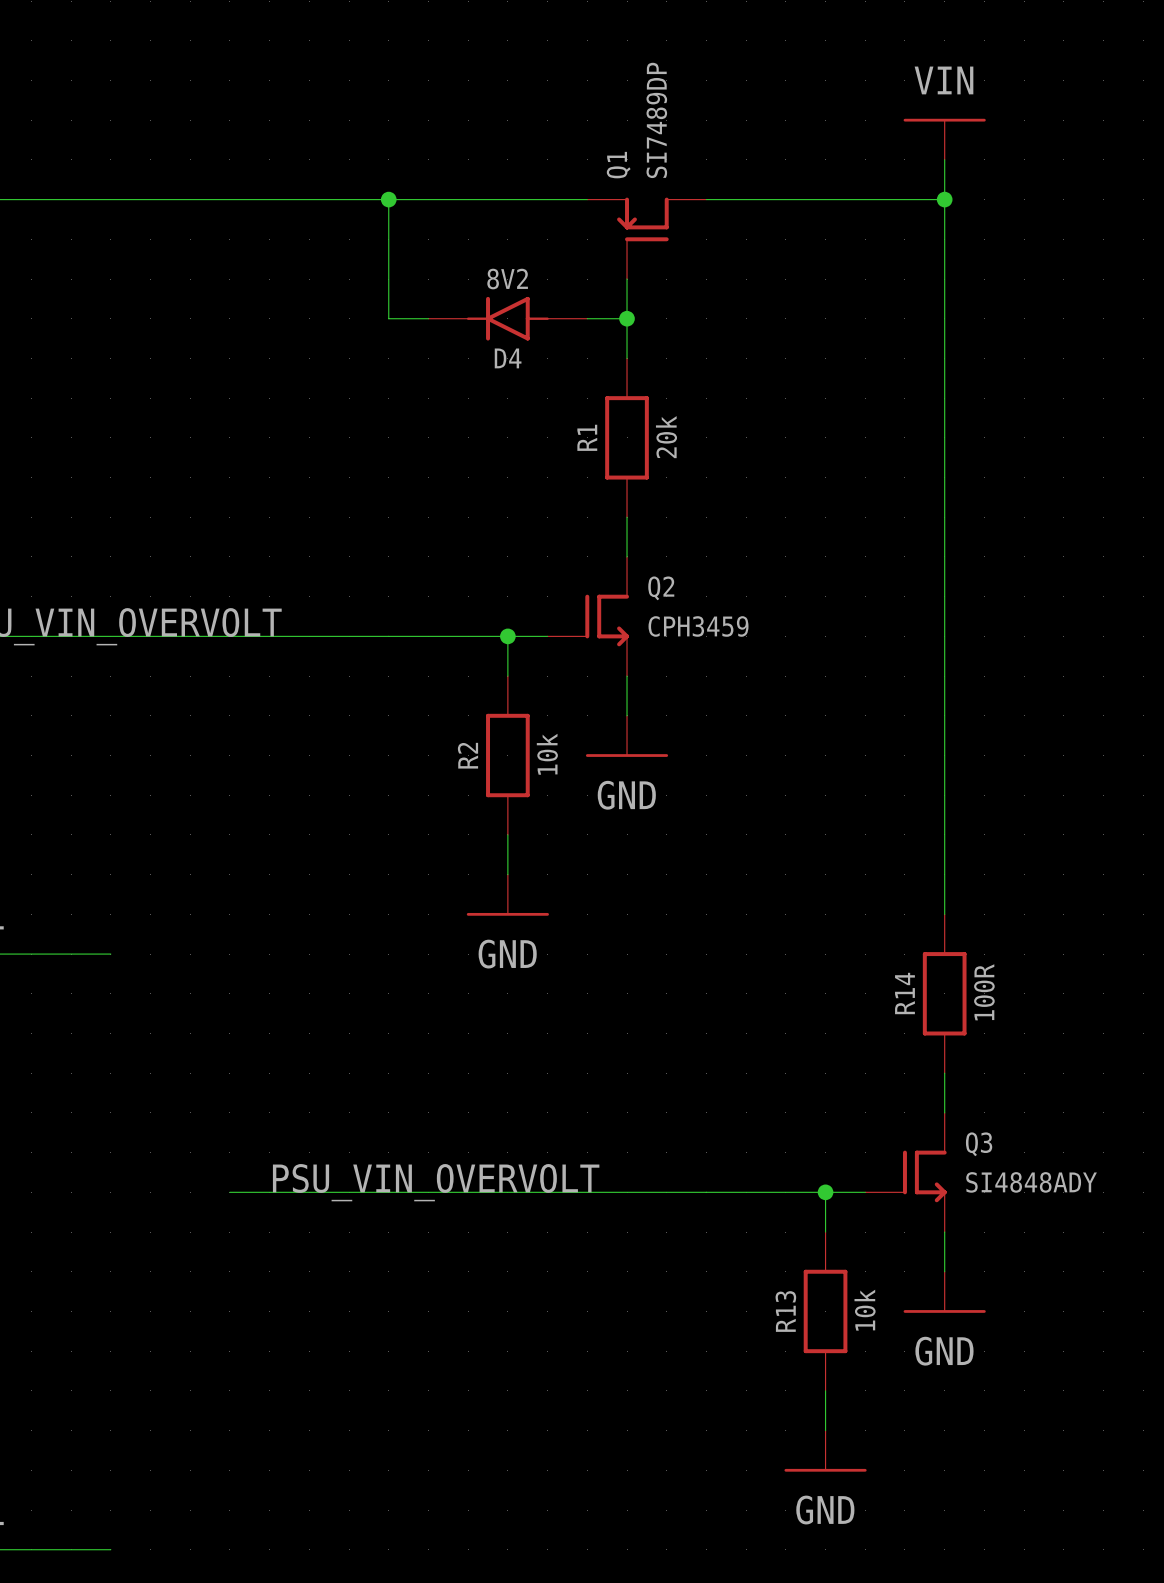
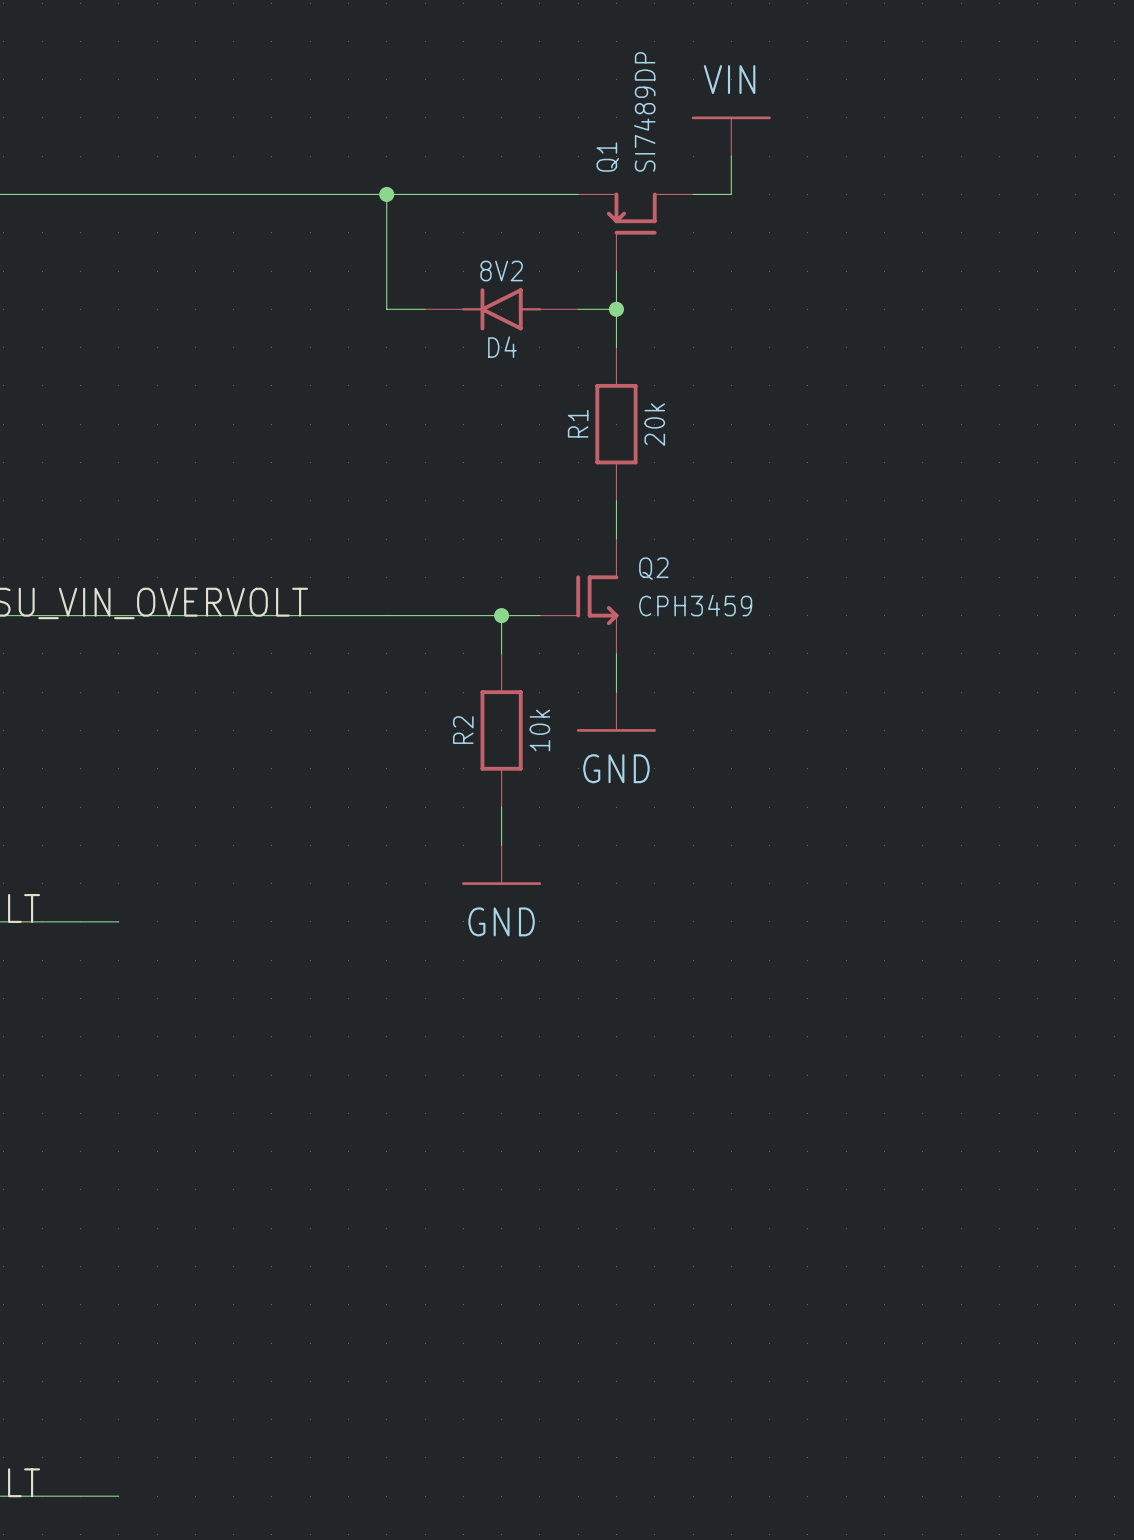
power symbol position: VIN (944, 139) -> VIN (731, 136)
wire: (944, 159) (944, 914) -> none
wire: (746, 199) (944, 199) -> (731, 194) (731, 156)
junction: (944, 199) -> none
R14: 100R (944, 993) -> none
wire: (944, 1073) (944, 1112) -> none
Q3: SI4848ADY (905, 1172) -> none
label: PSU_VIN_OVERVOLT (436, 1182) -> none
wire: (229, 1192) (865, 1192) -> none
wire: (825, 1192) (825, 1232) -> none
junction: (825, 1192) -> none
wire: (944, 1232) (944, 1271) -> none
power symbol: GND (944, 1292) -> none
R13: 10k (825, 1311) -> none
wire: (825, 1390) (825, 1430) -> none
power symbol: GND (825, 1451) -> none

